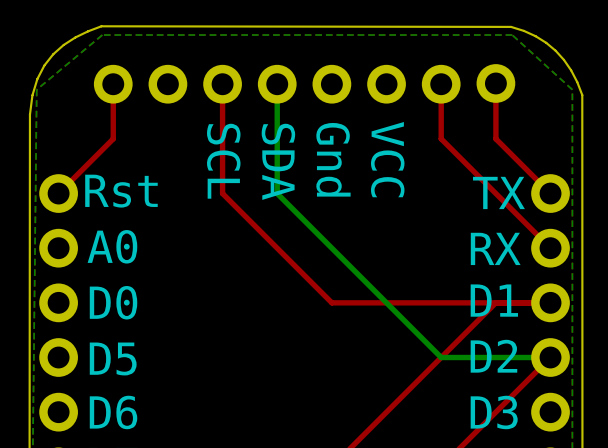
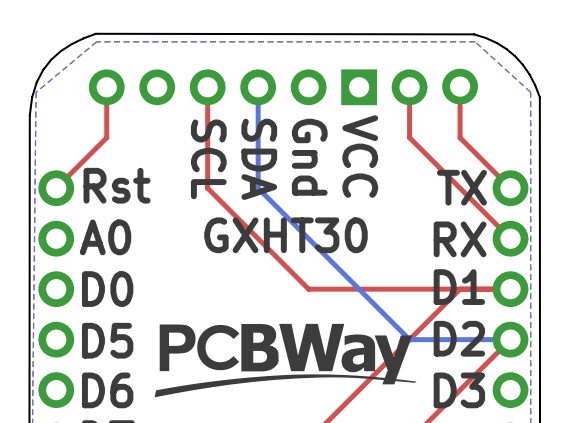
part footprint: [367, 64, 406, 104] -> [341, 69, 377, 106]
text: none -> GXHT30 (285, 235)
drawing: none -> [154, 323, 417, 398]

